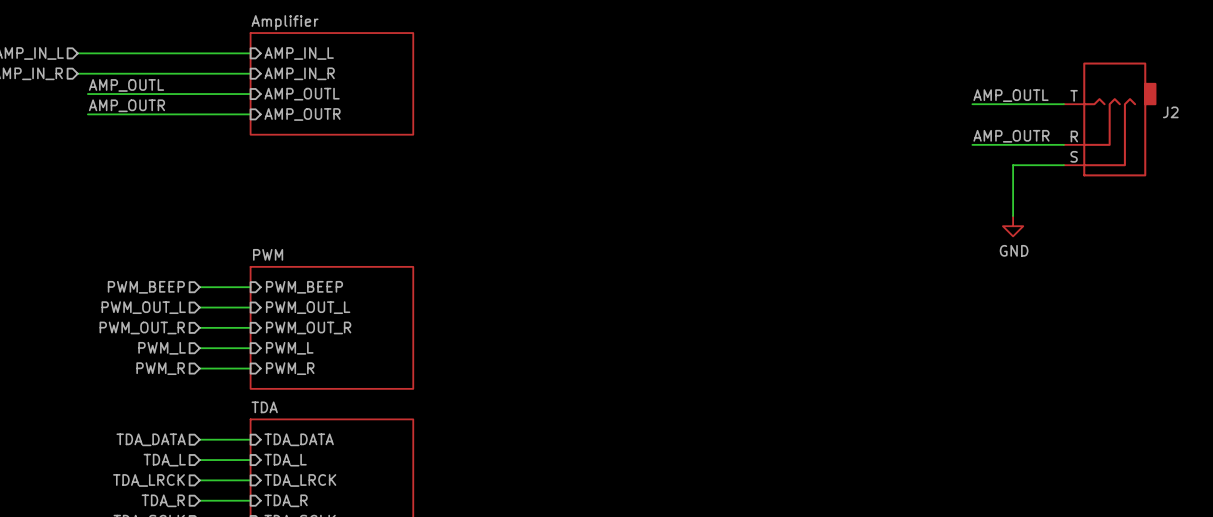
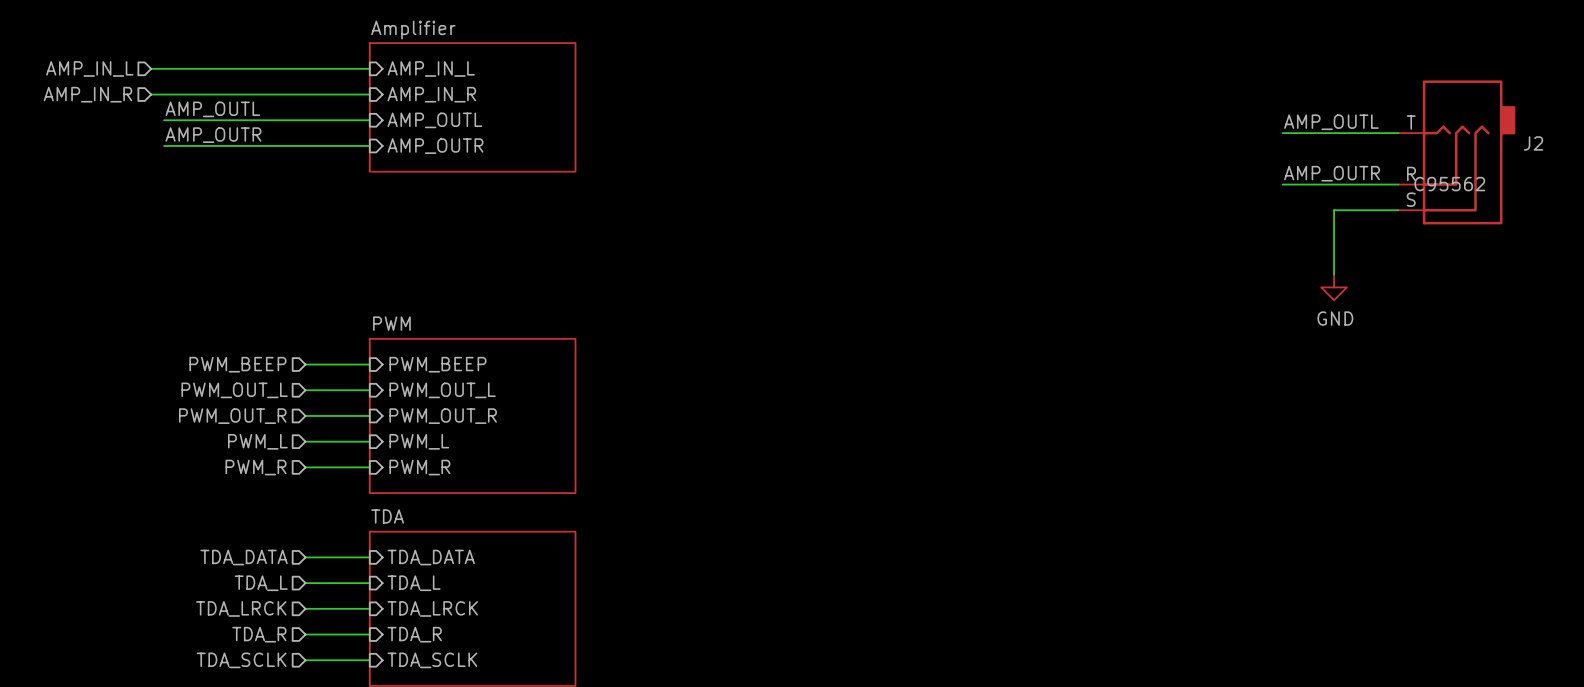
J2 text: none -> C95562 (1449, 184)

